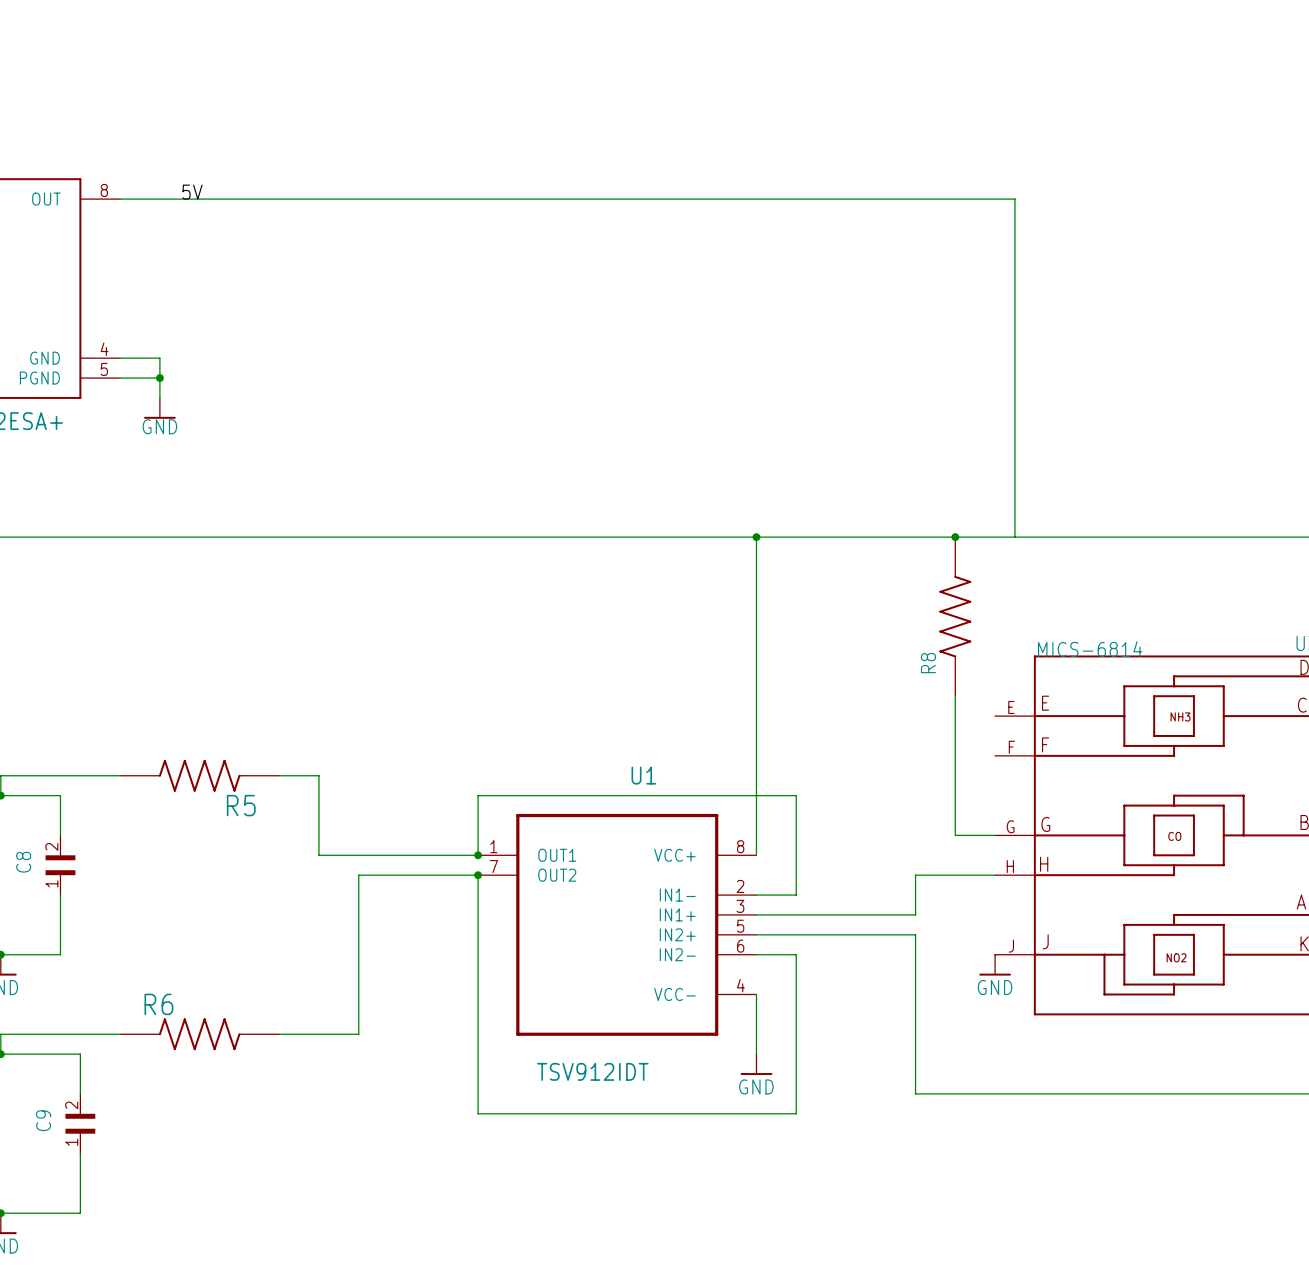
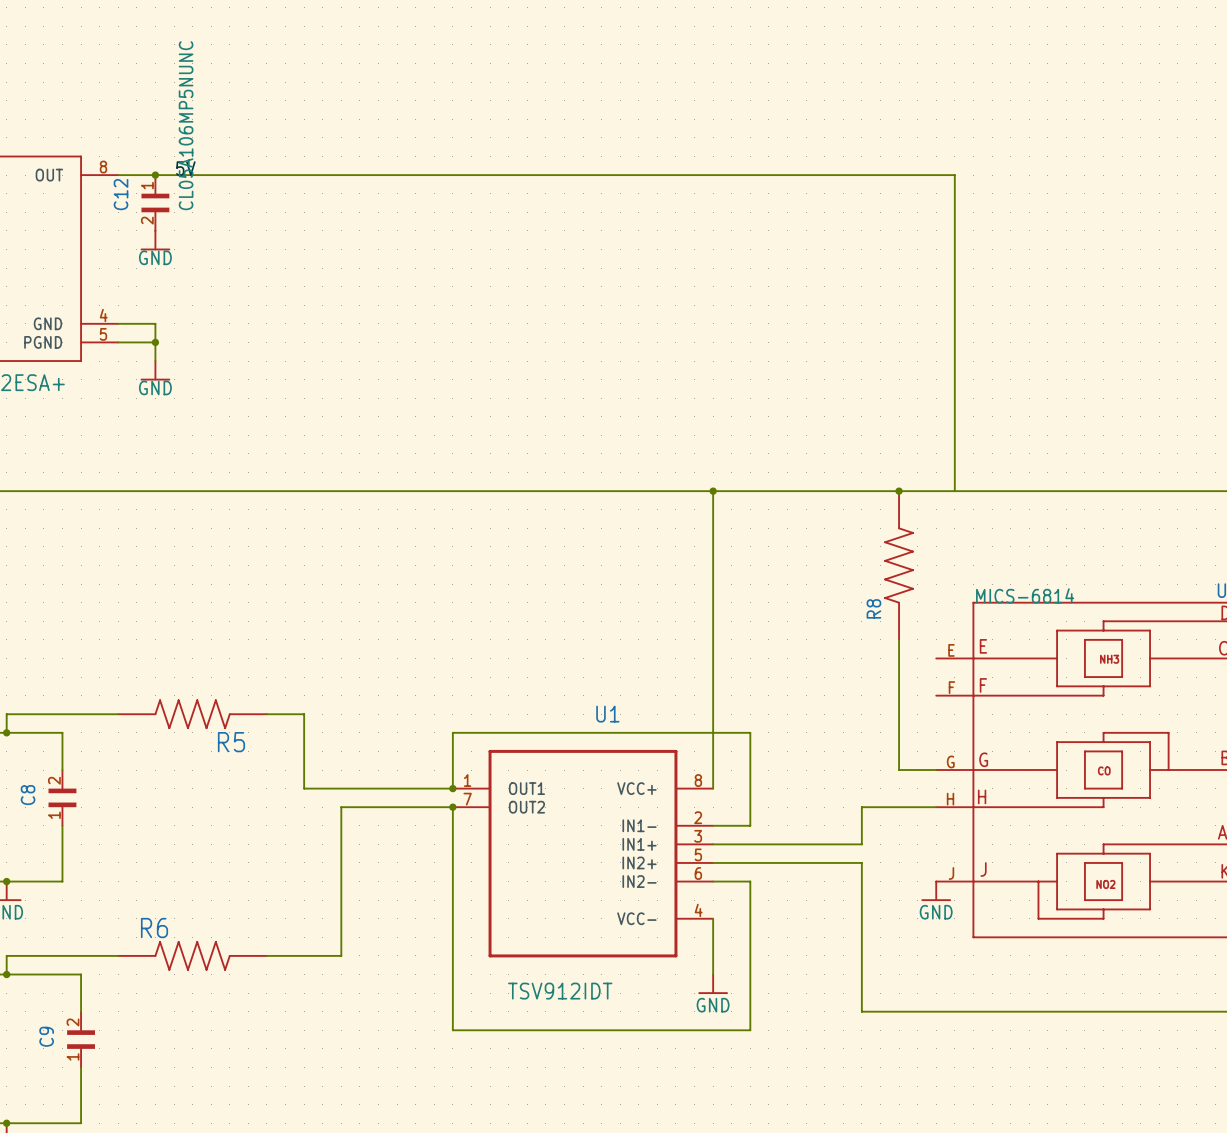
junction: none -> (155, 175)
C12: none -> CL05A106MP5NUNC (155, 202)
power symbol: none -> GND (155, 240)

